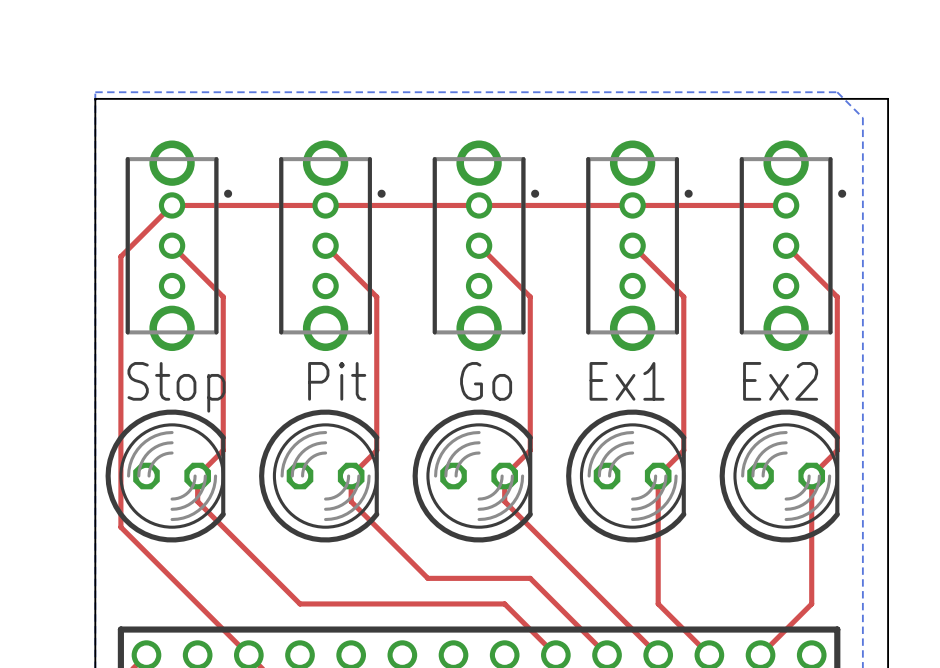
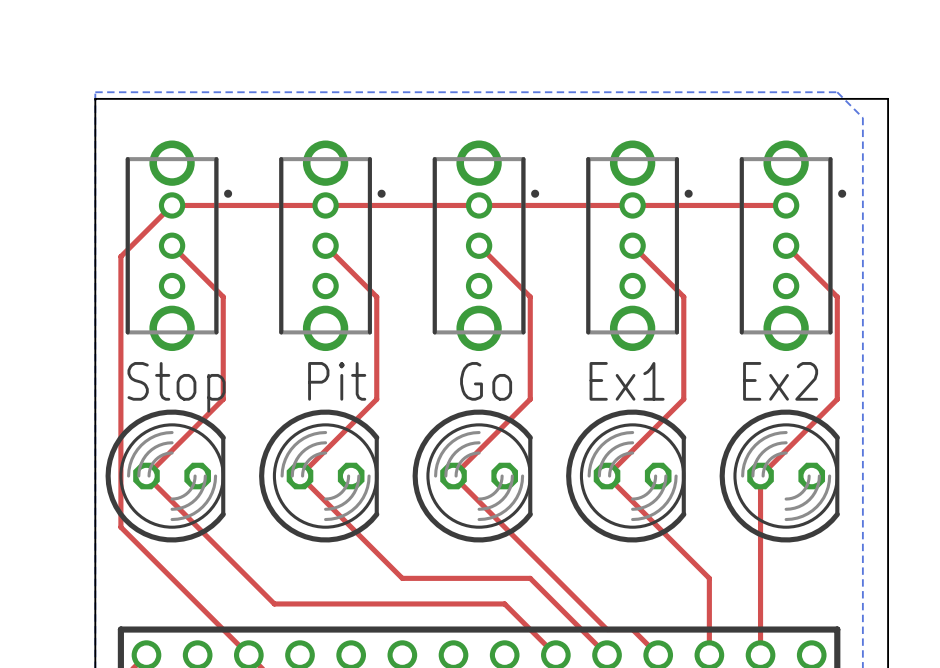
top track: (223, 399) (223, 450) (197, 476) (197, 501) (300, 603) -> (223, 399) (146, 476) (274, 603) (300, 603)
top track: (376, 399) (376, 450) (351, 476) (351, 501) (427, 578) -> (376, 399) (300, 476) (402, 578) (427, 578)
top track: (530, 399) (530, 450) (504, 476) (504, 501) (632, 629) -> (530, 399) (453, 476) (607, 629) (632, 629)
top track: (683, 399) (683, 450) (658, 476) (658, 603) (709, 655) -> (683, 399) (607, 476) (709, 578) (709, 655)
top track: (837, 399) (837, 450) (811, 476) (811, 603) (760, 655) -> (837, 399) (760, 476) (760, 655)

